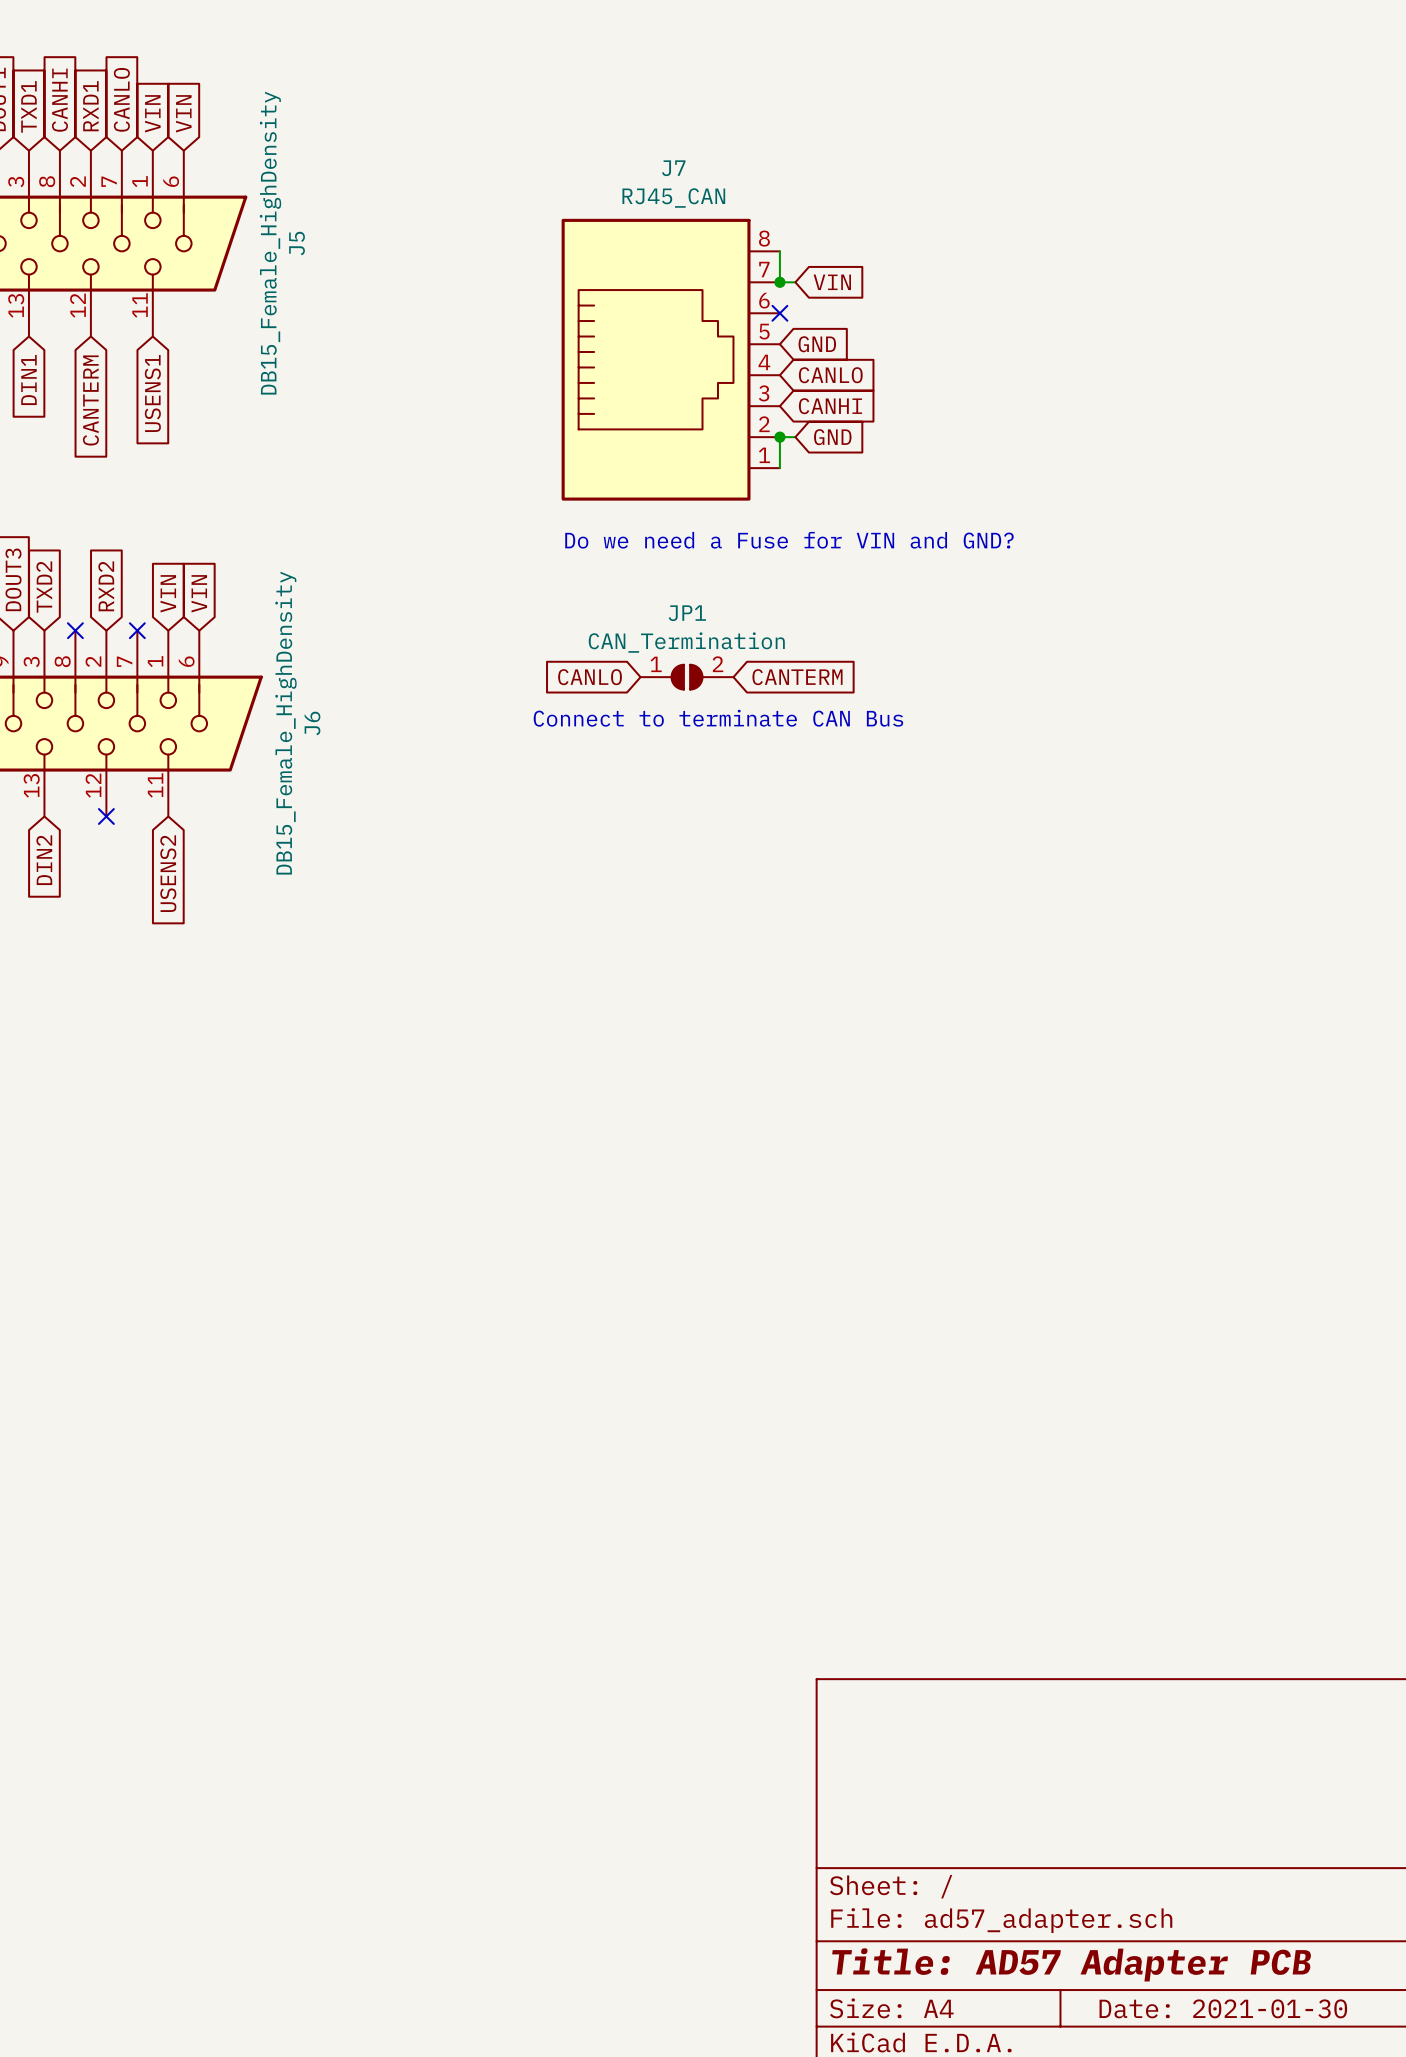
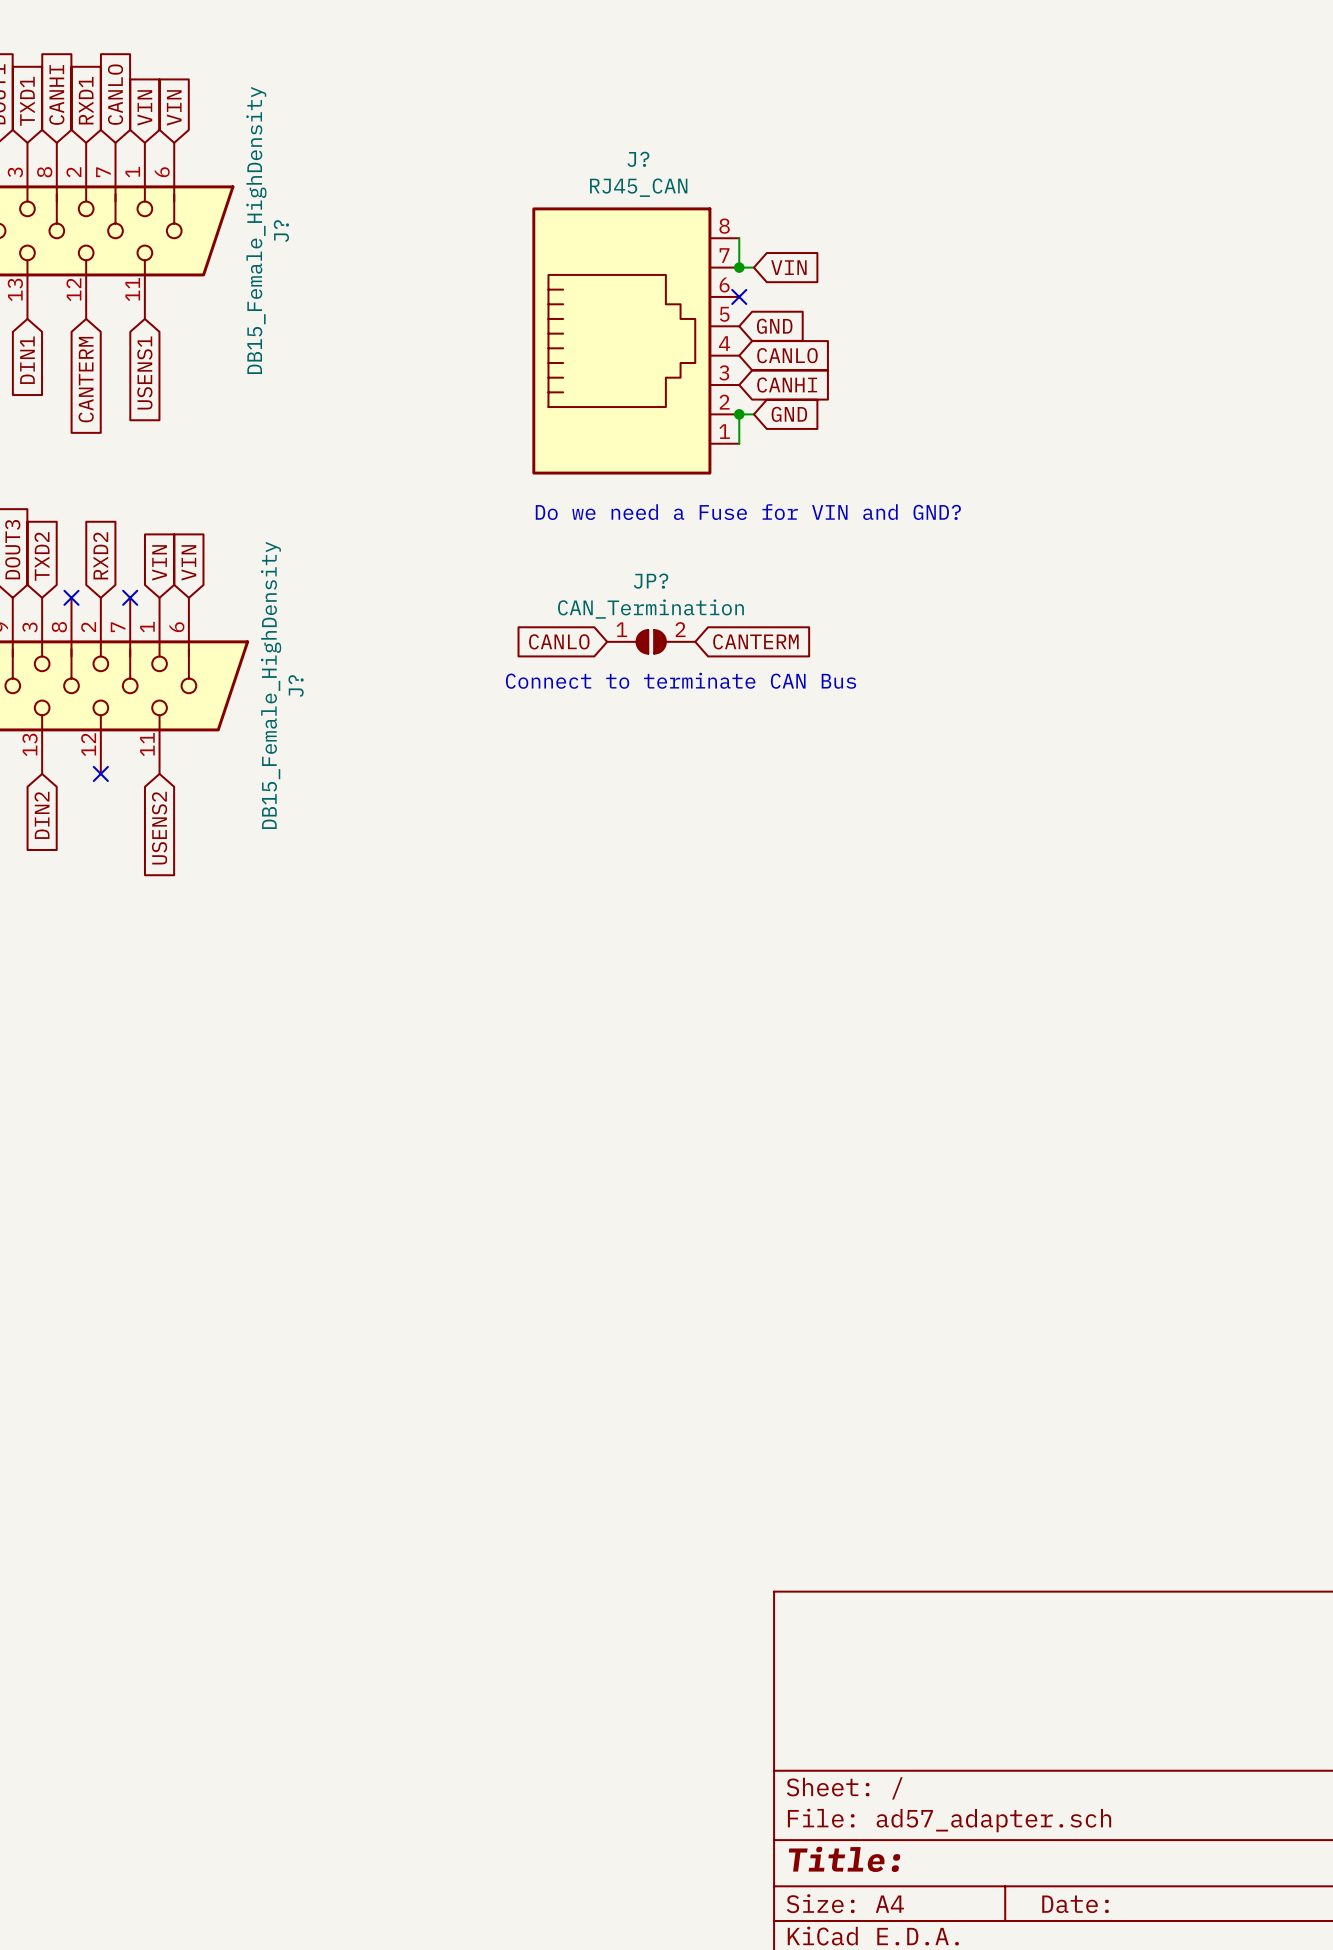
J7 name: J7 (673, 168) -> J? (638, 159)
J5 name: J5 (297, 243) -> J? (281, 231)
JP1 name: JP1 (687, 613) -> JP? (651, 581)
J6 name: J6 (312, 723) -> J? (296, 686)
title block: Title: AD57 Adapter PCB (1071, 1964) -> Title: (844, 1859)
title block: Date: 2021-01-30 (1223, 2008) -> Date: (1075, 1904)

